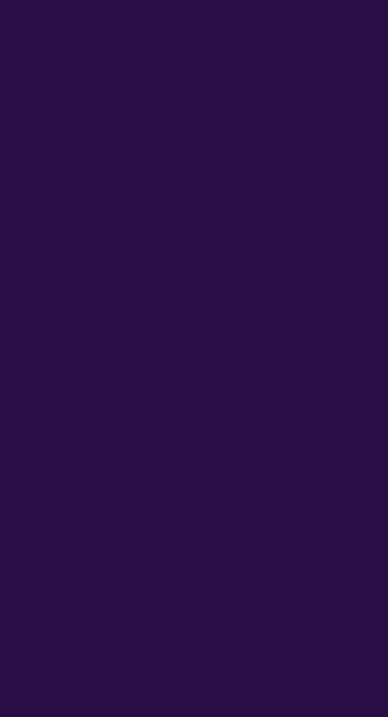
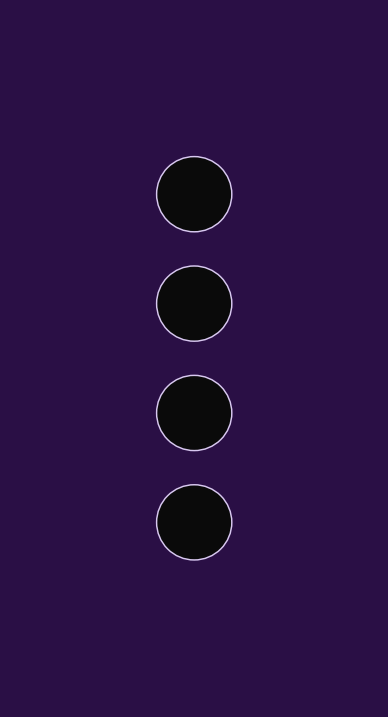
part: none -> (194, 194)
part: none -> (194, 303)
part: none -> (194, 412)
part: none -> (194, 522)

